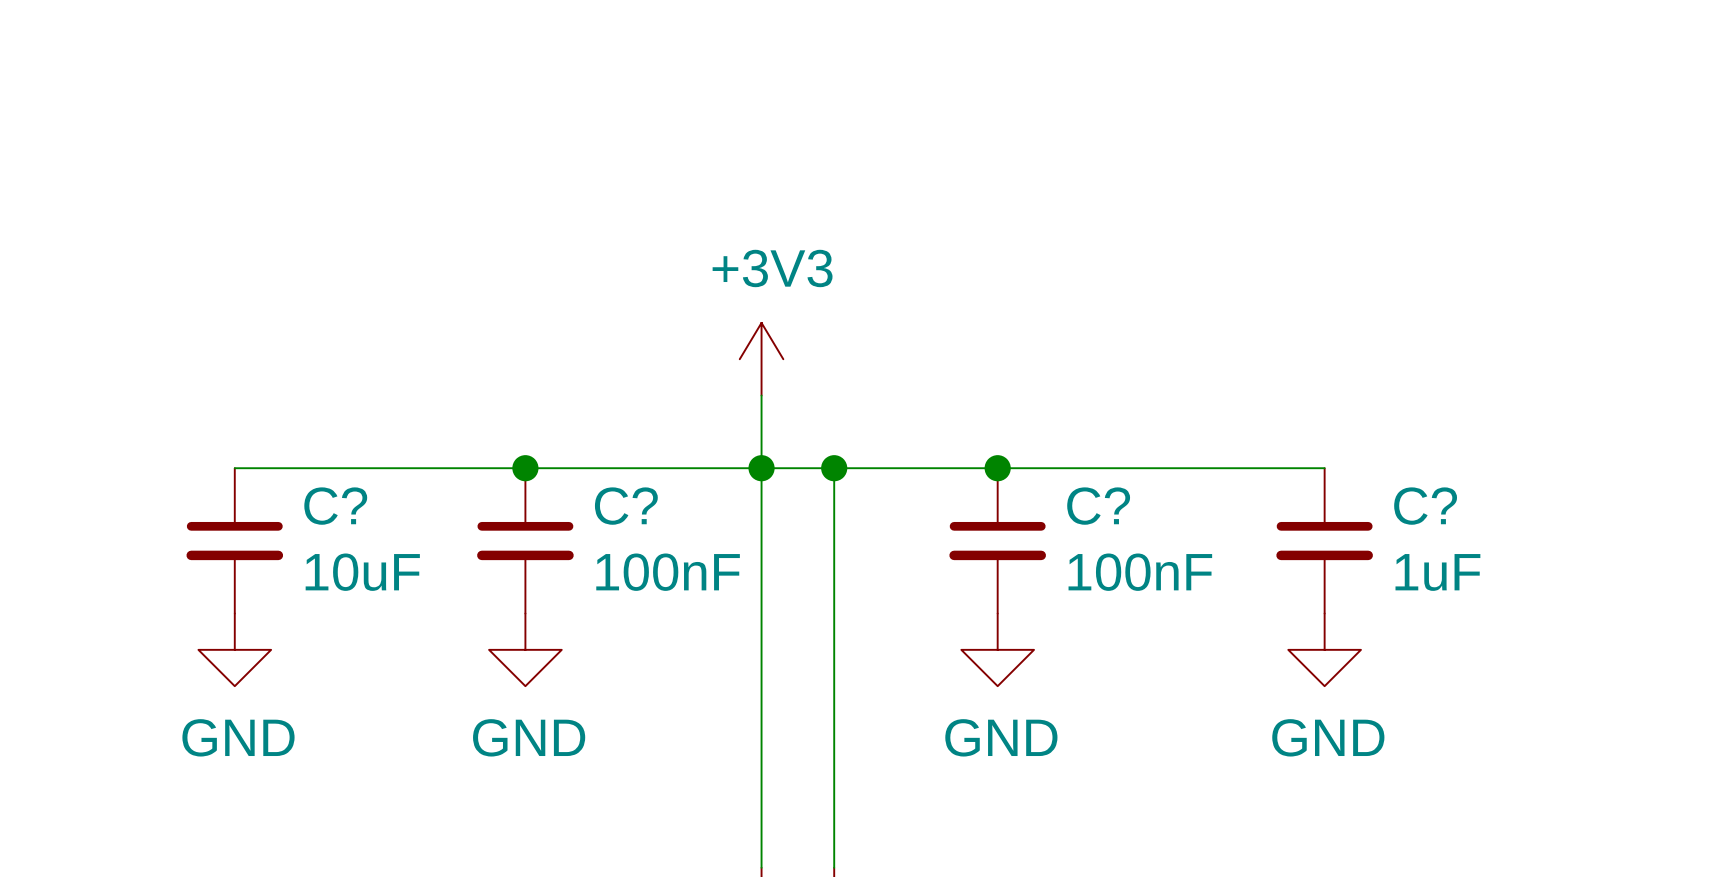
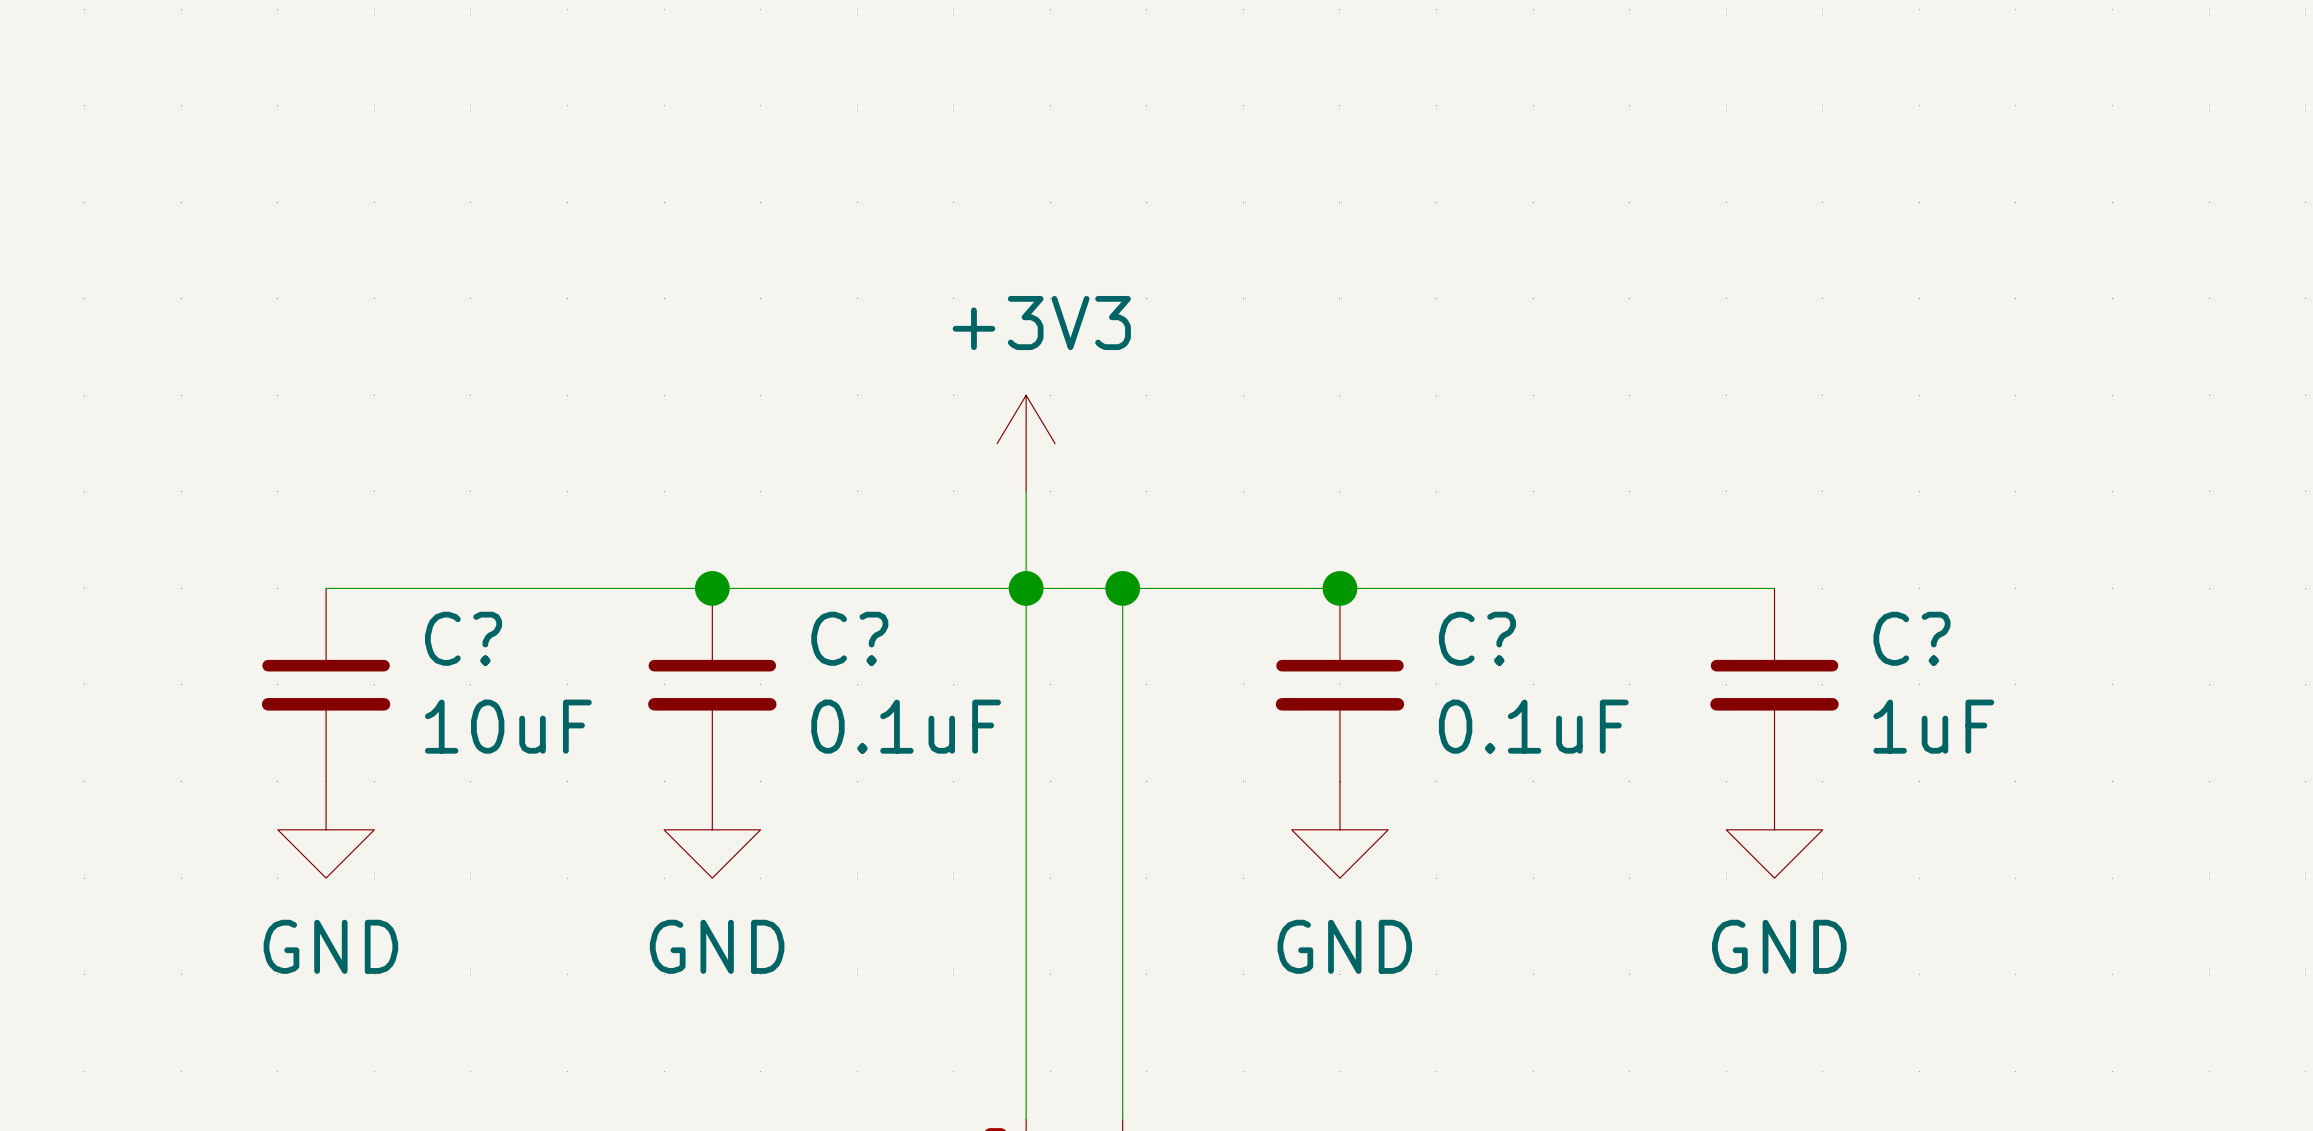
C? value: 100nF (668, 572) -> 0.1uF (906, 726)
C? value: 100nF (1140, 572) -> 0.1uF (1533, 726)

